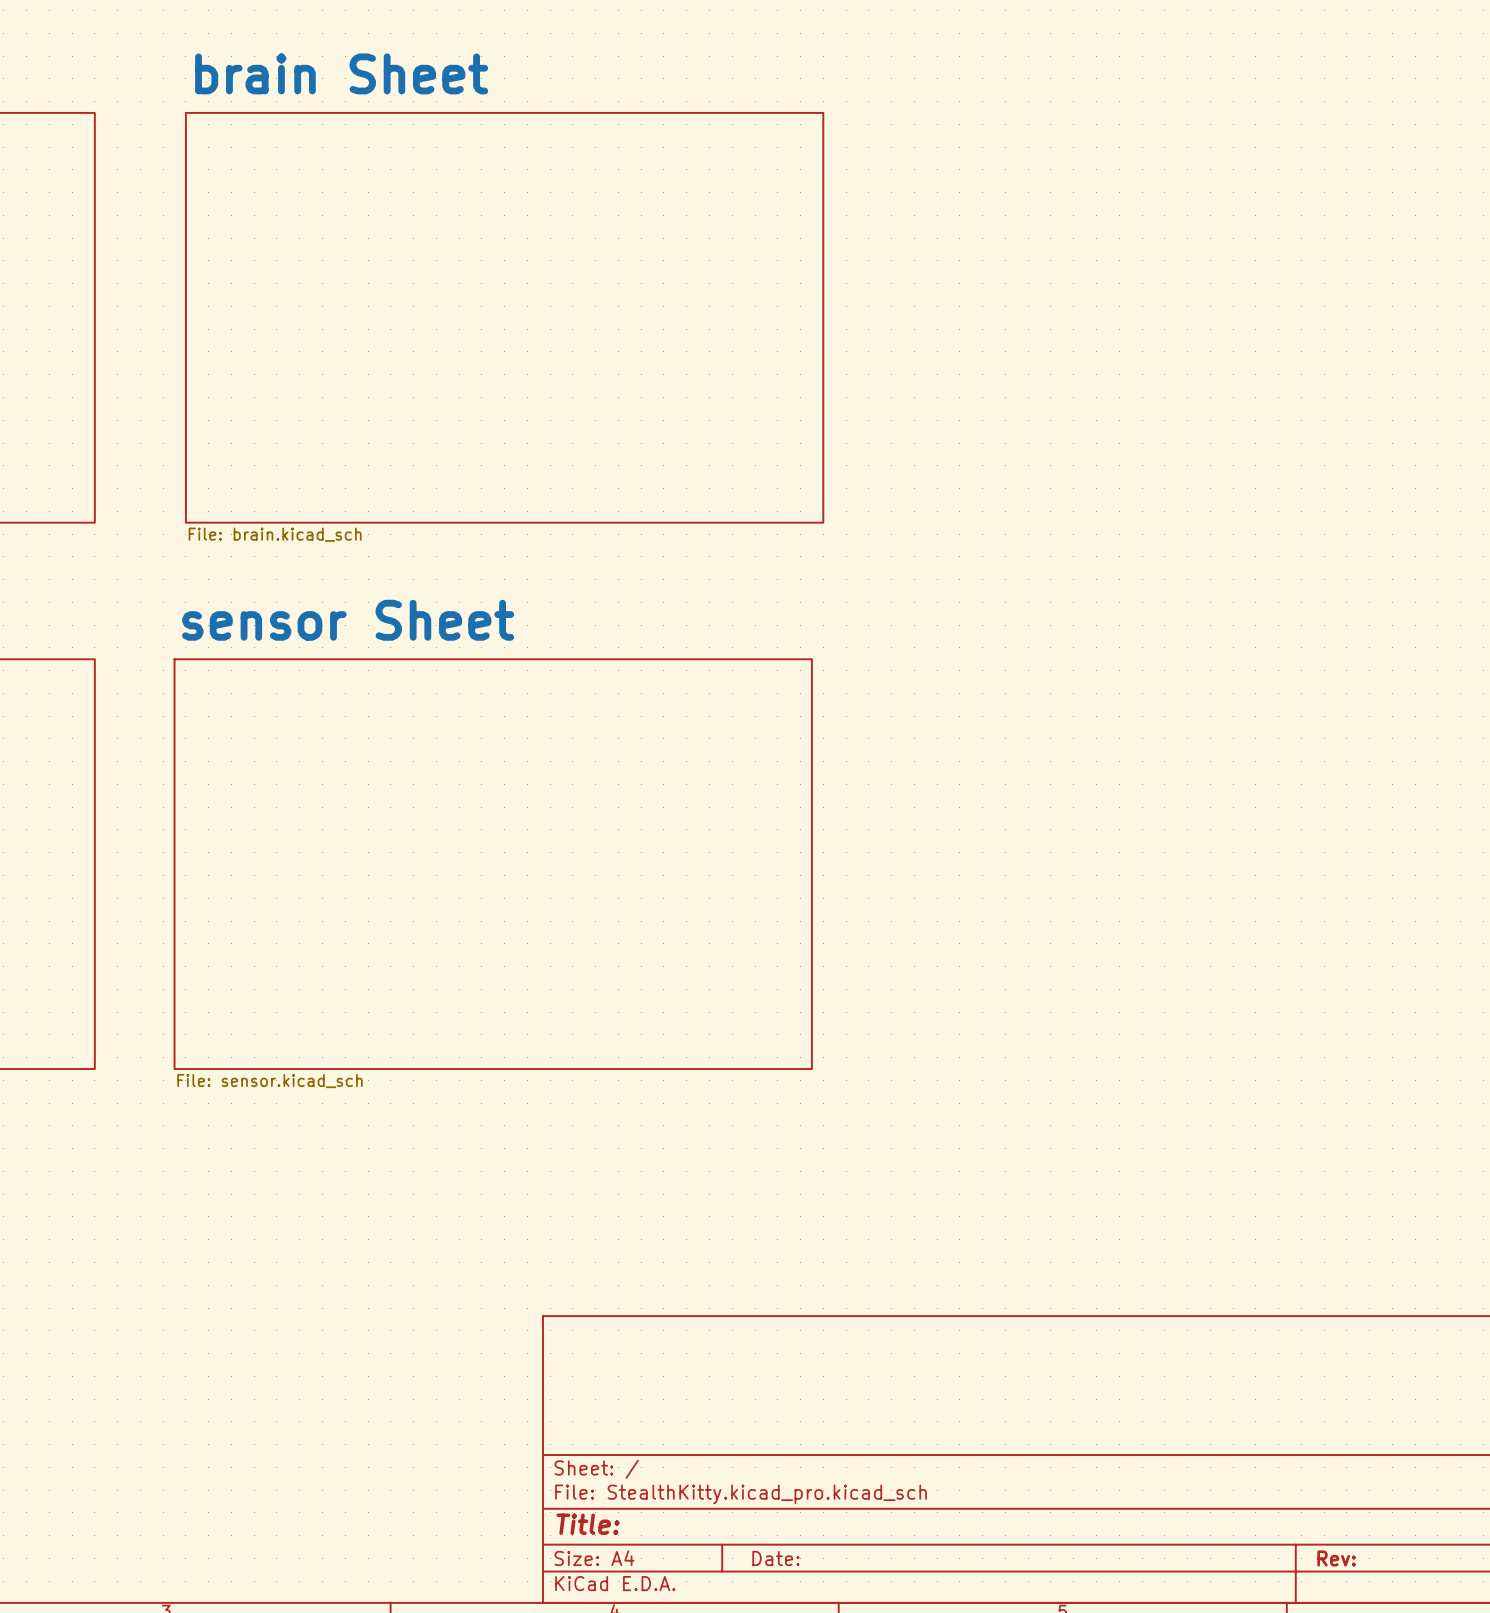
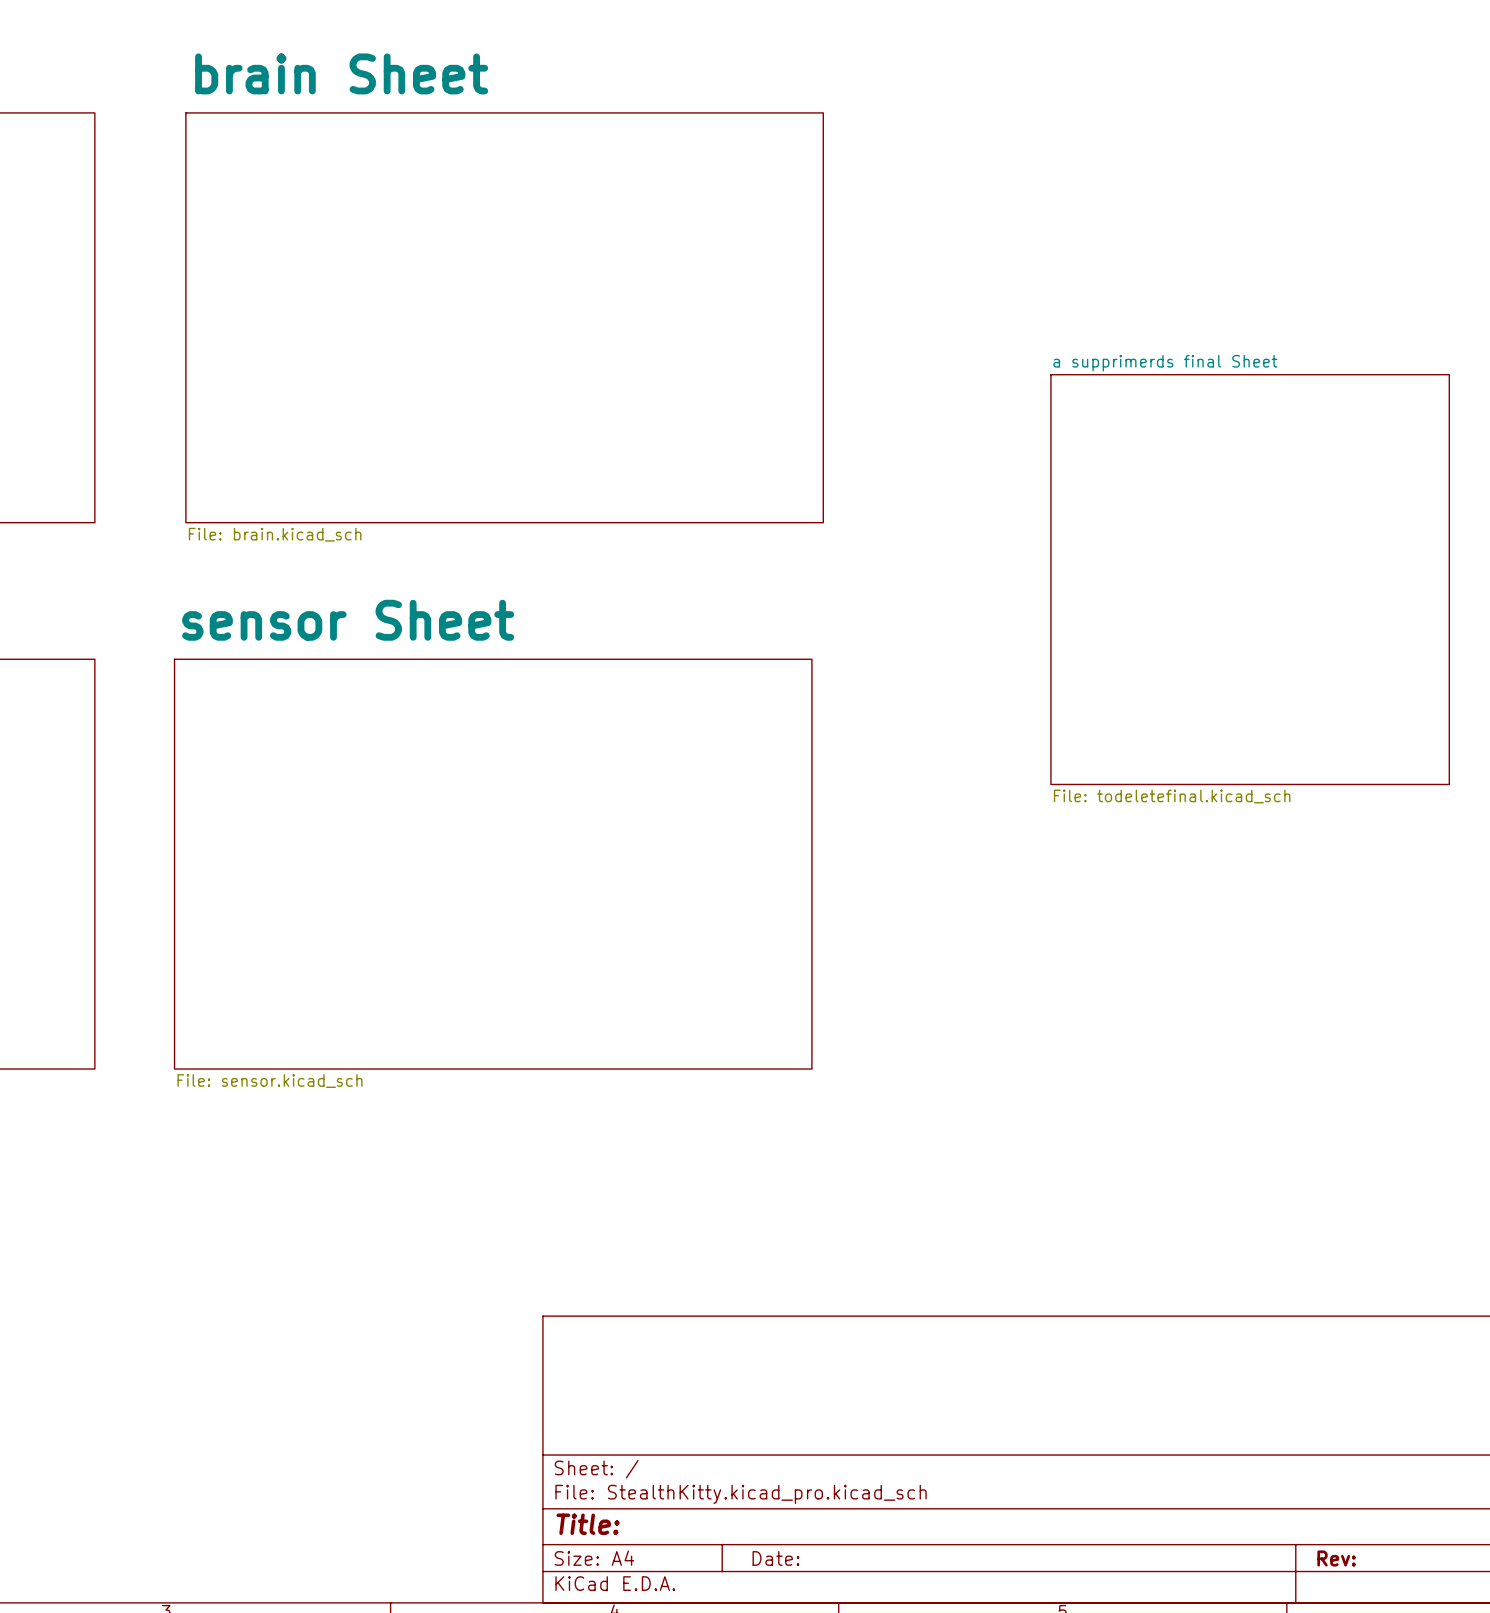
sheet a supprimerds final Sheet: none -> File: todeletefinal.kicad_sch (1250, 579)

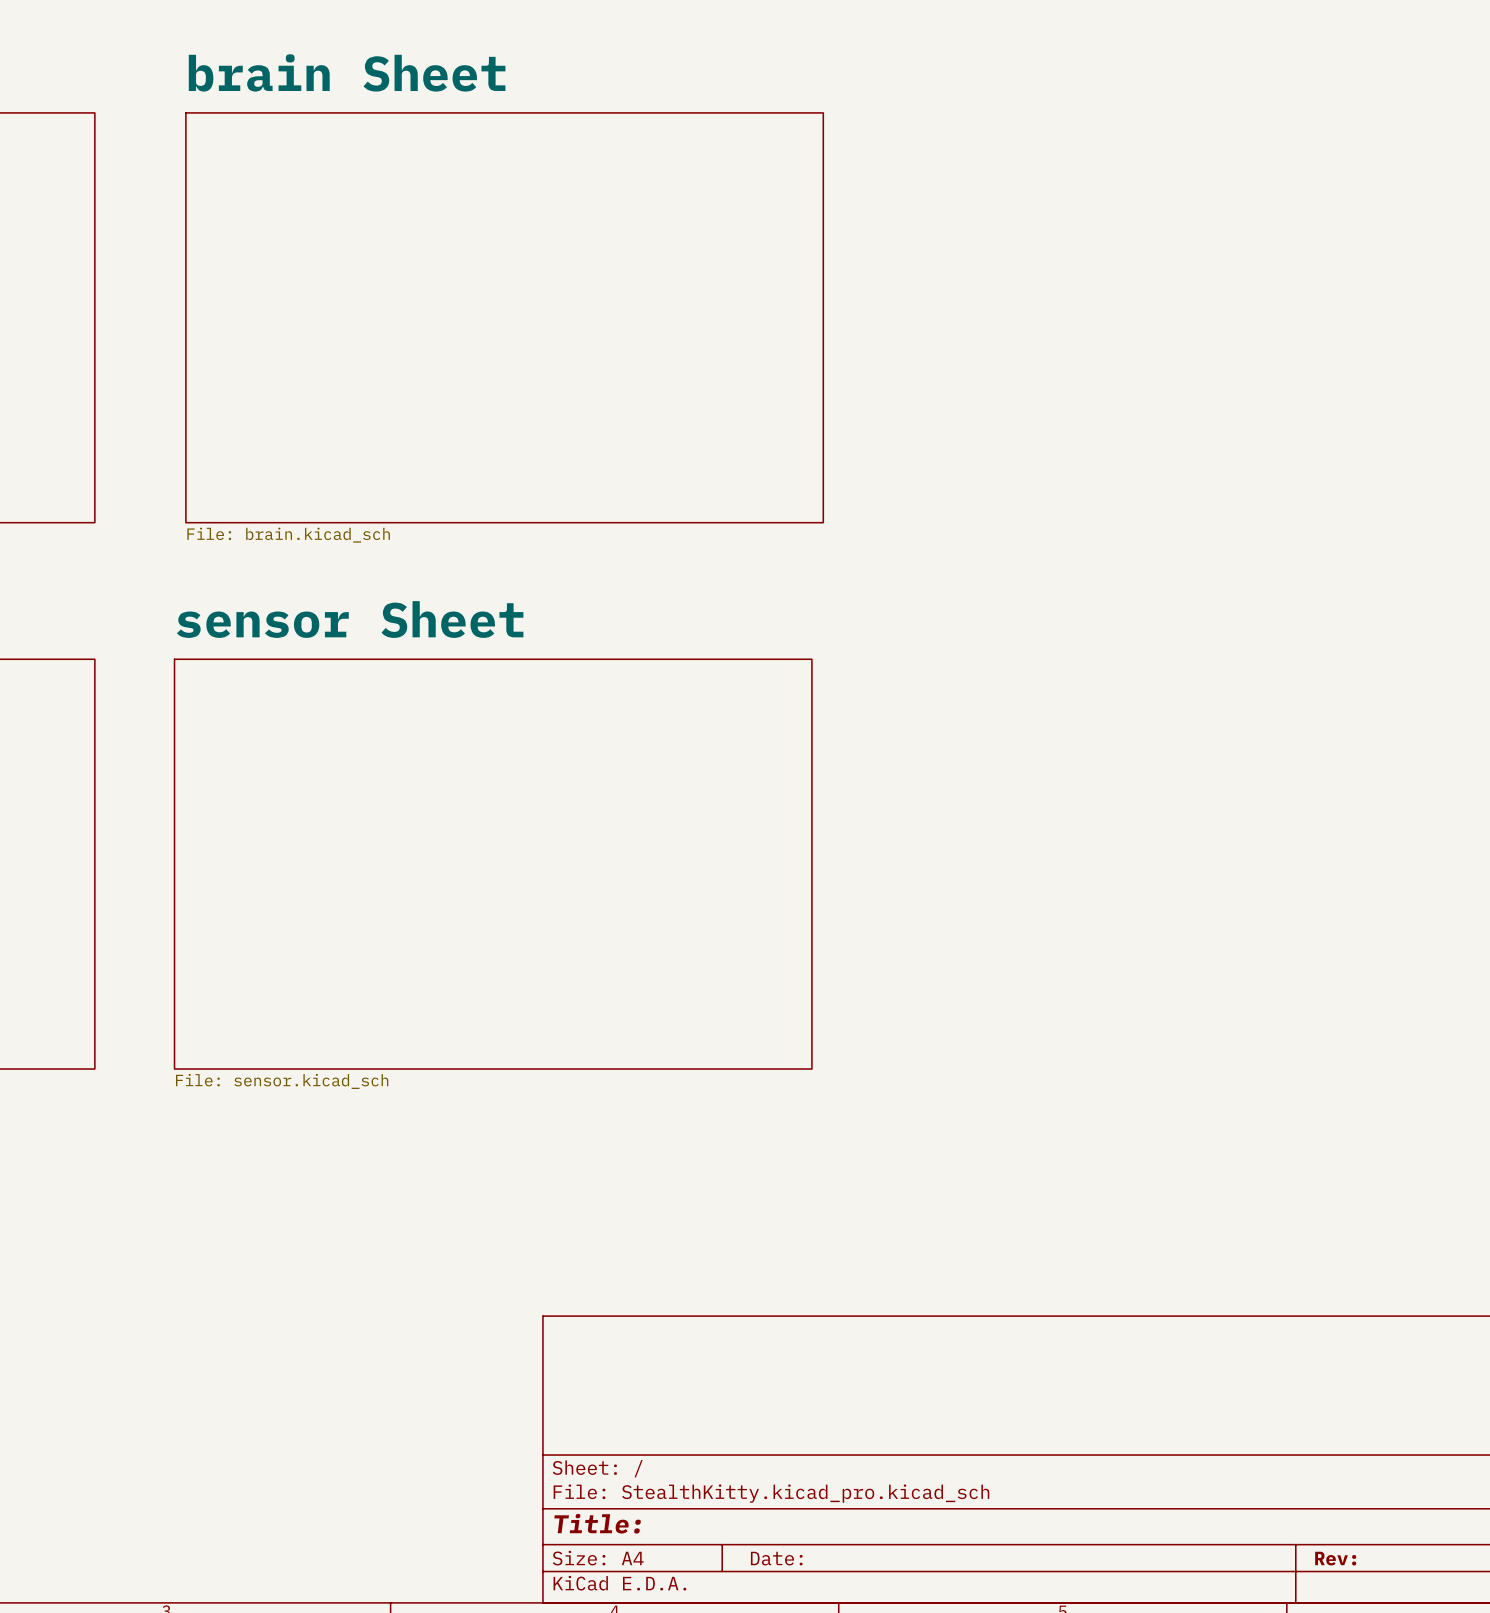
sheet a supprimerds final Sheet: File: todeletefinal.kicad_sch (1250, 579) -> none

